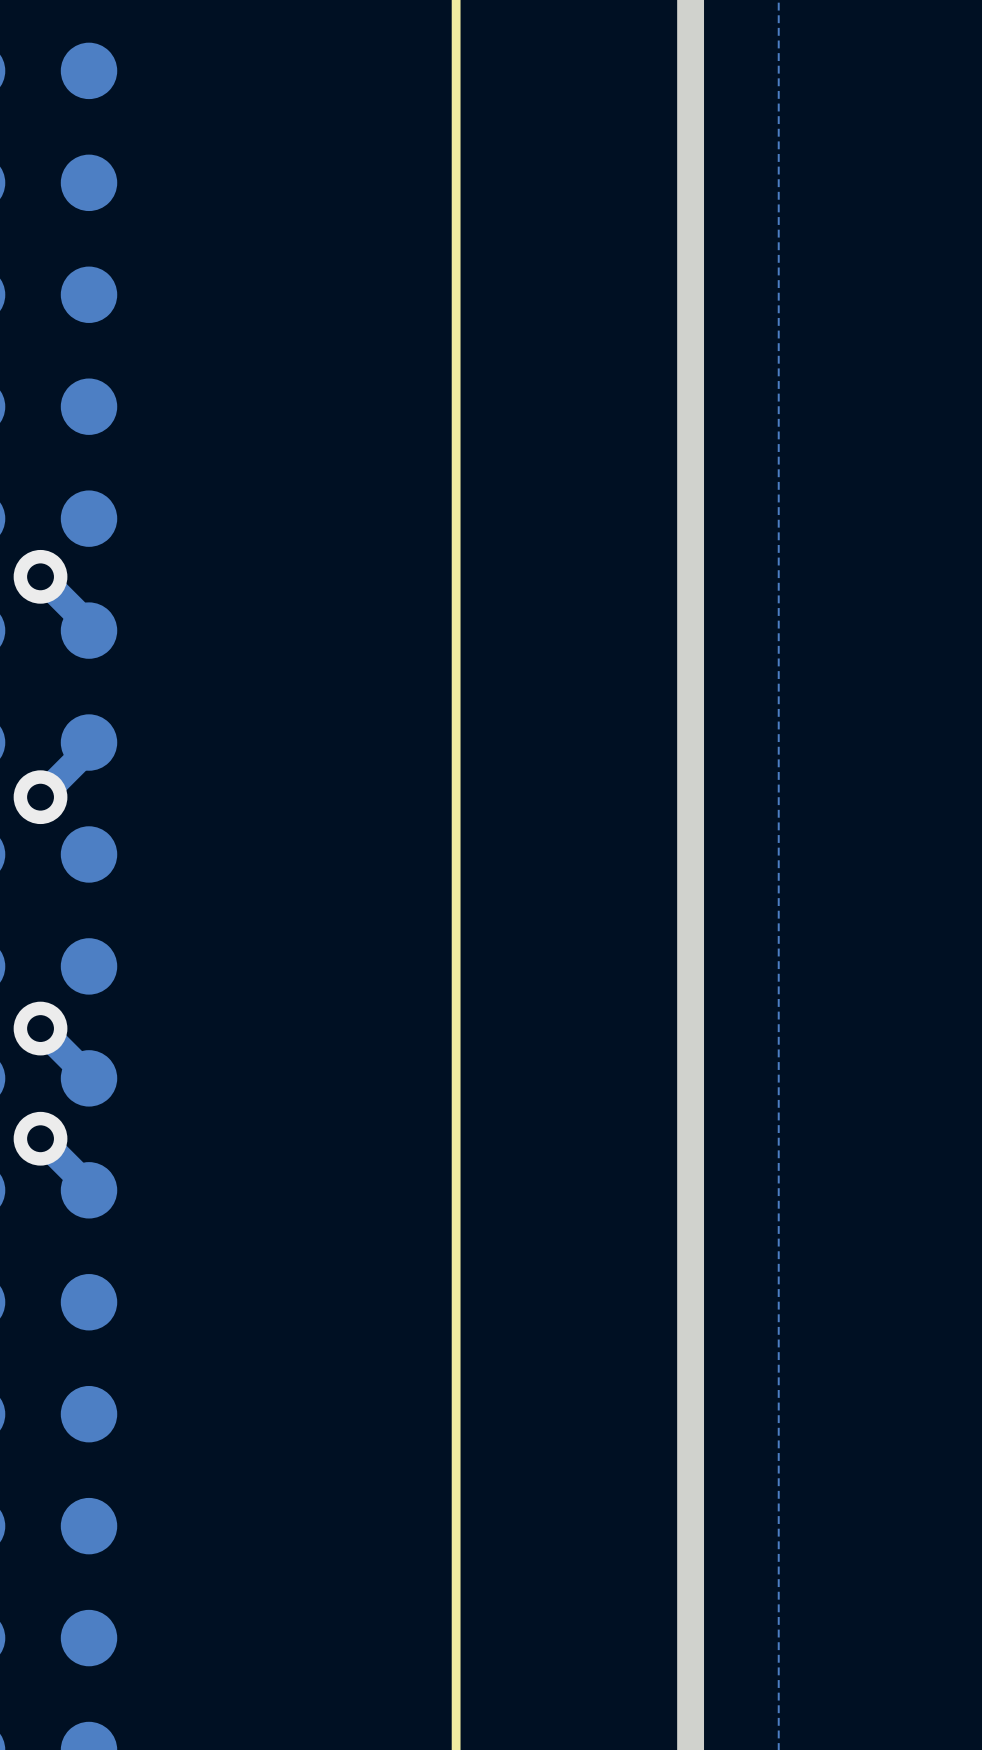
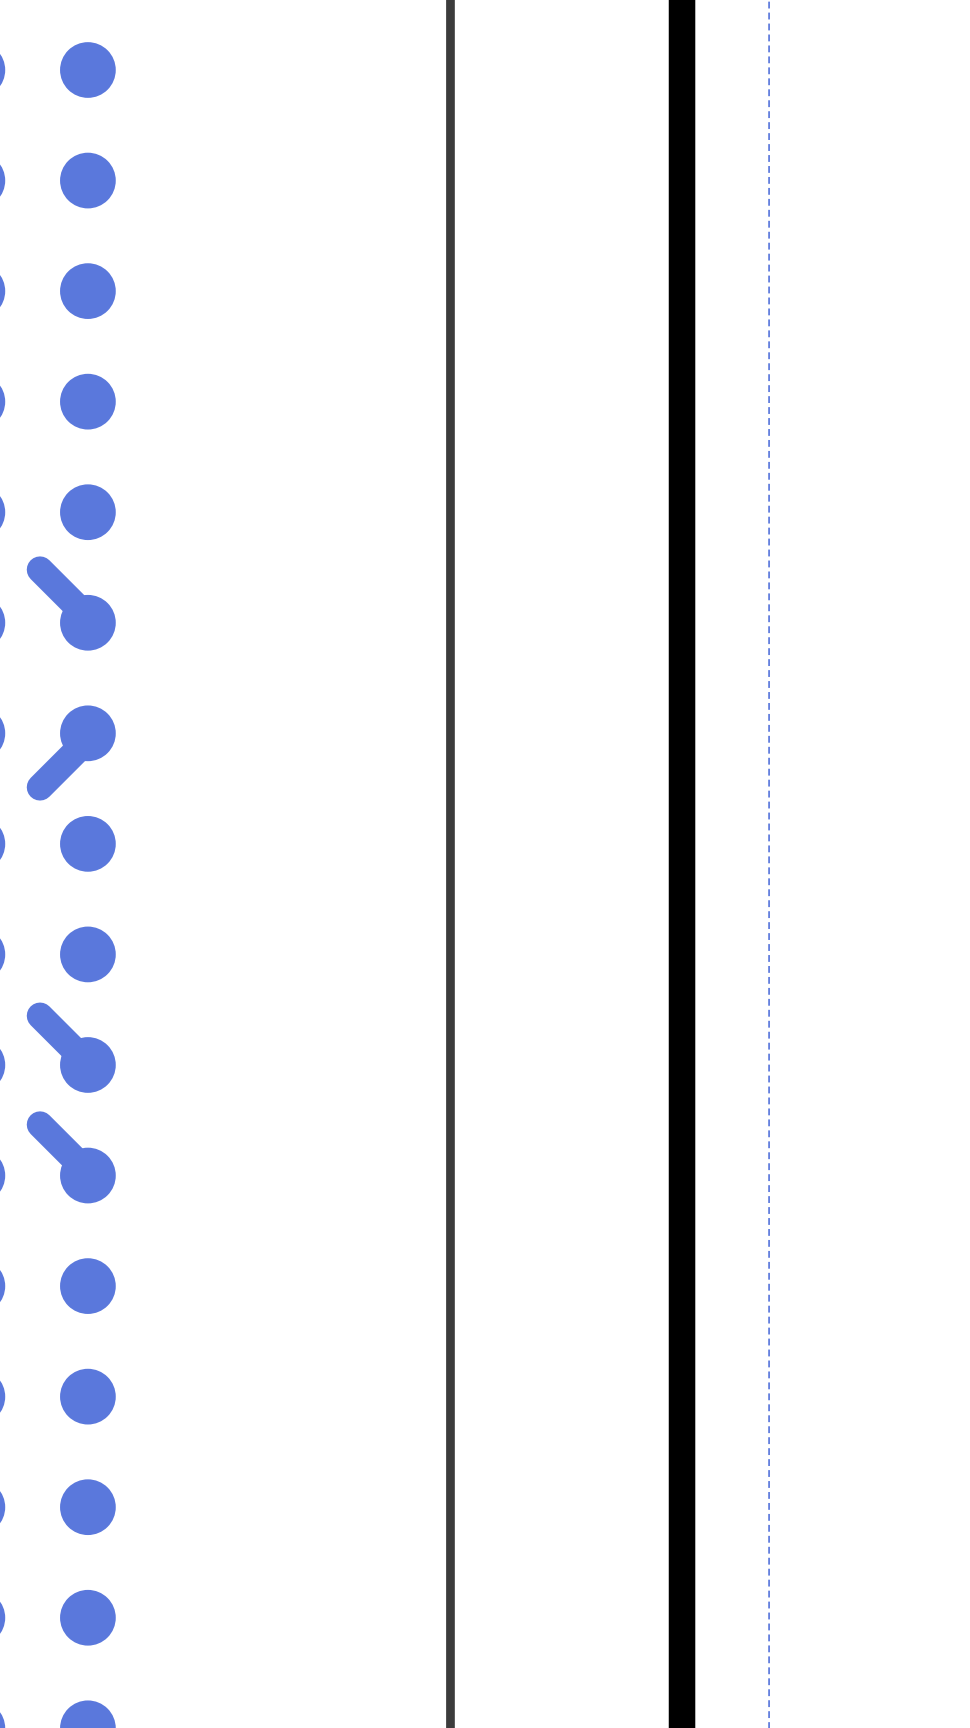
via: (40, 576) -> none
via: (40, 797) -> none
via: (40, 1028) -> none
via: (40, 1138) -> none

